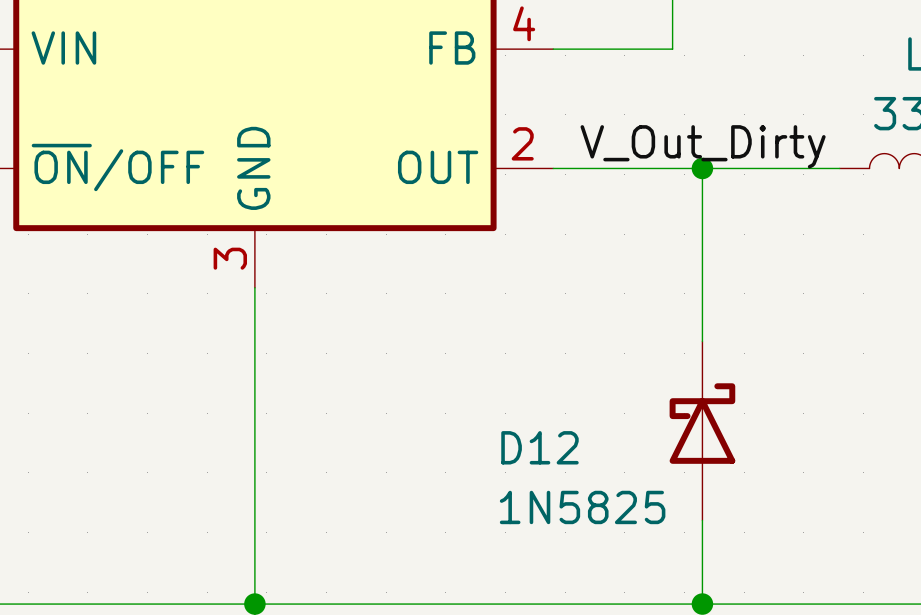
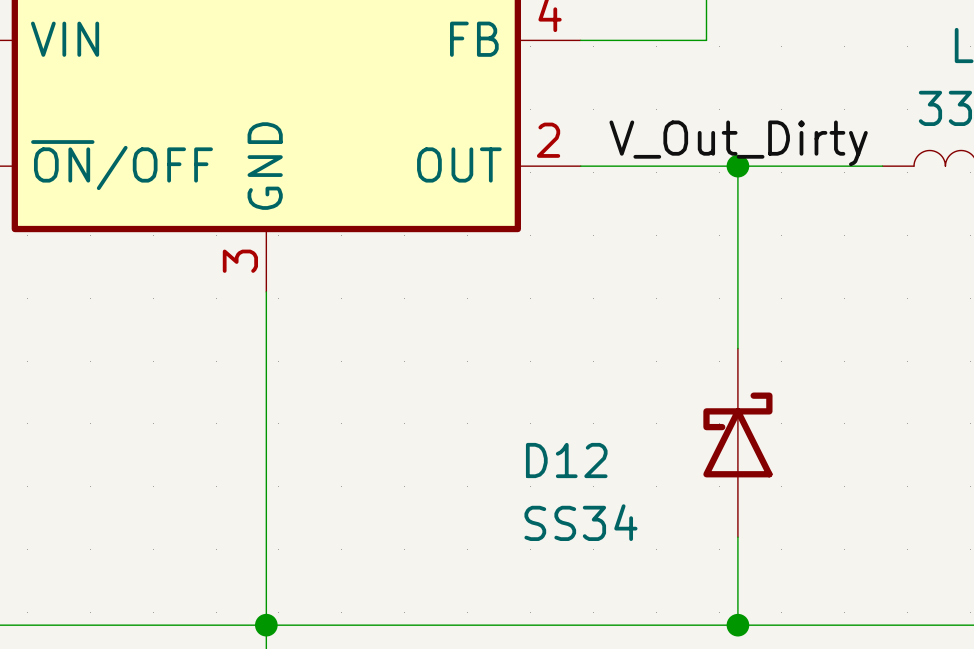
D12 value: 1N5825 (582, 507) -> SS34 (580, 522)

